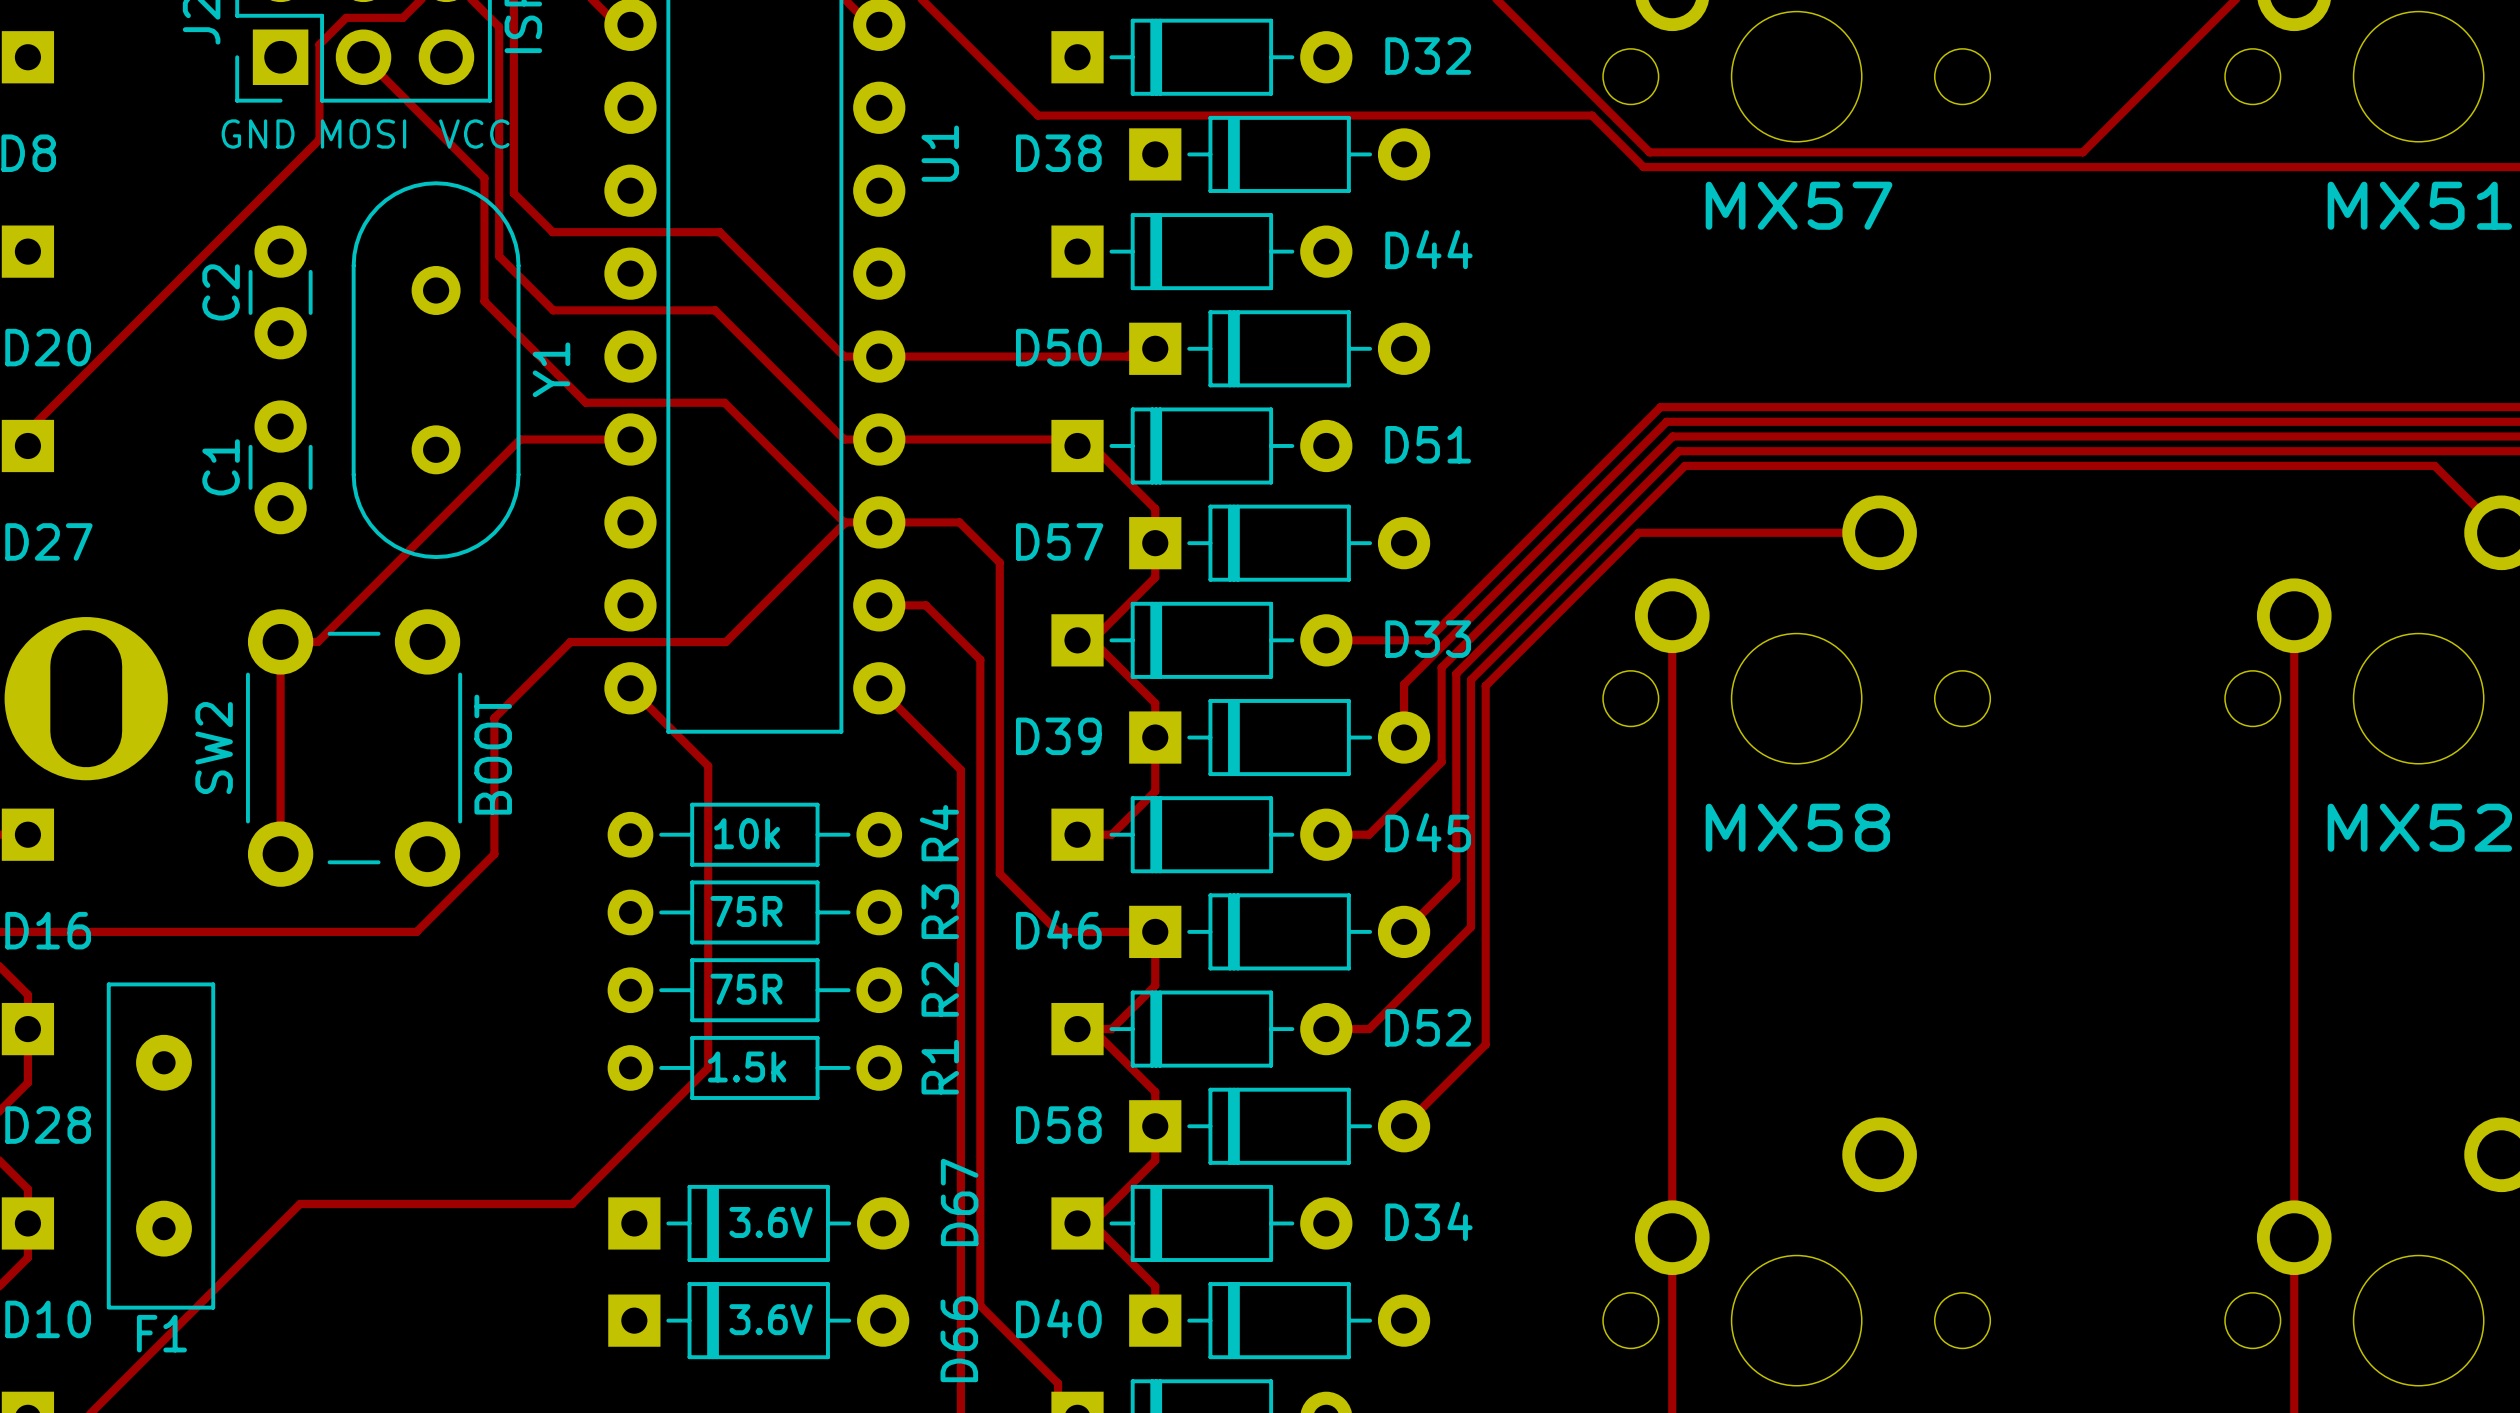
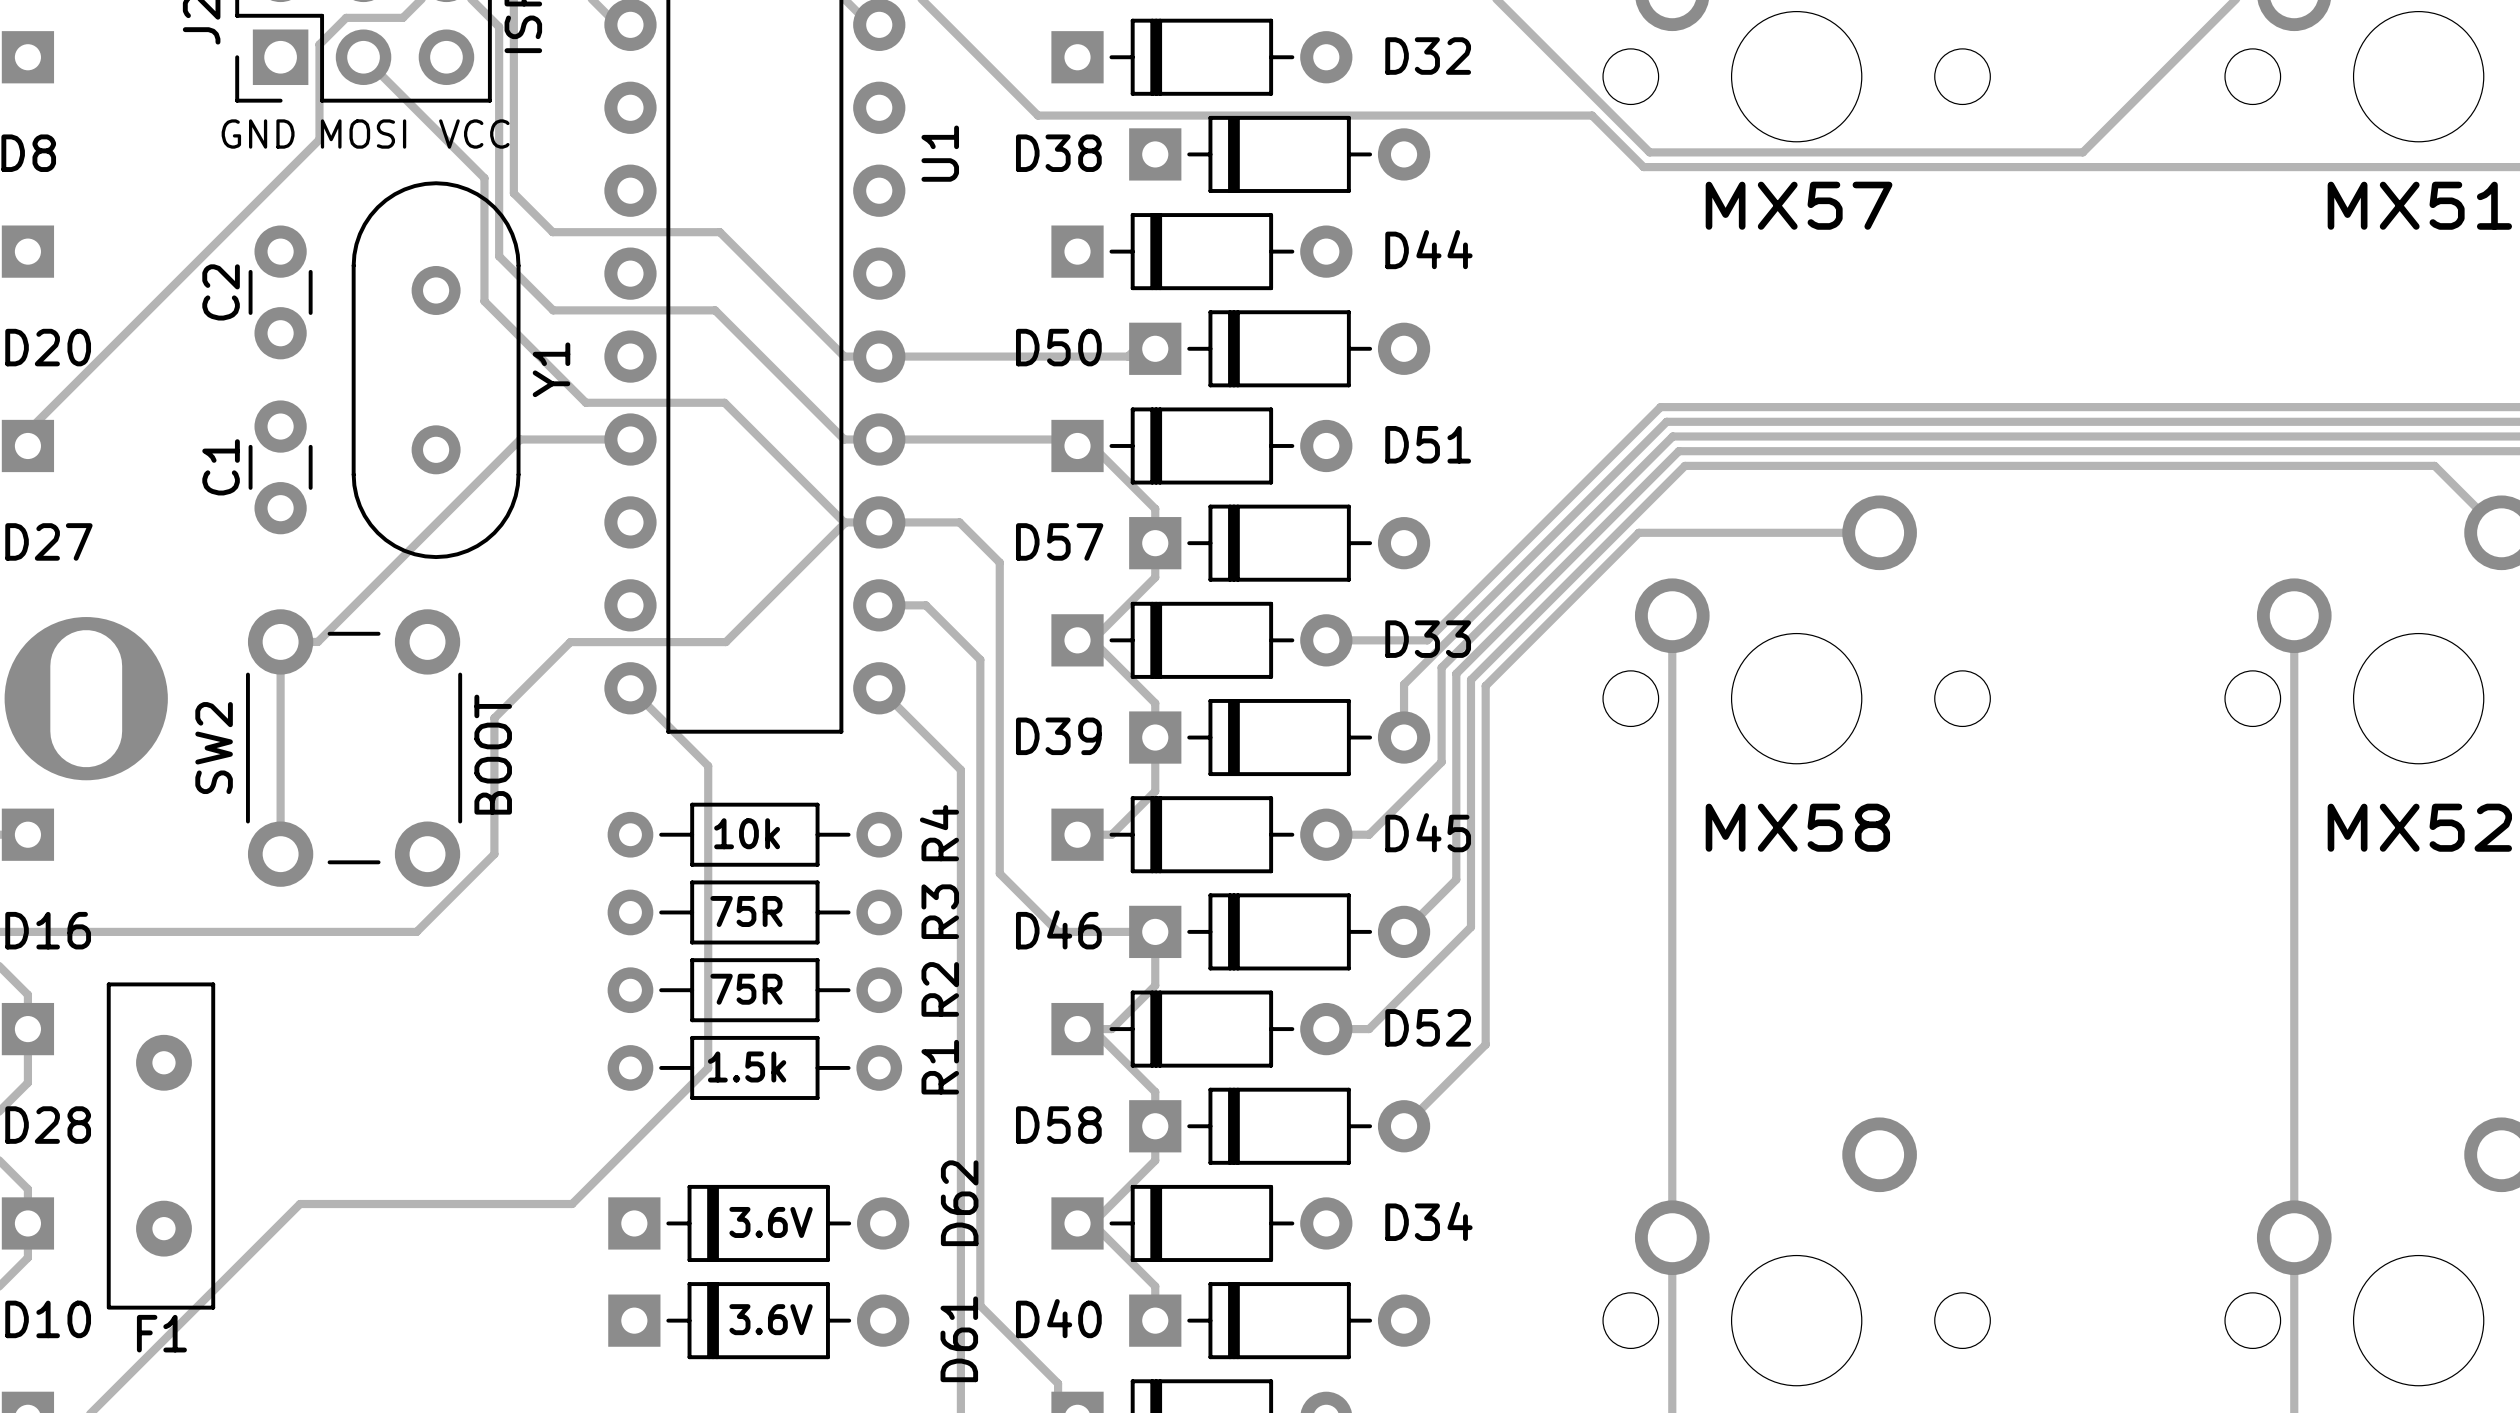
D67 name: D67 (959, 1202) -> D62 (959, 1203)
D66 name: D66 (959, 1339) -> D61 (959, 1339)

